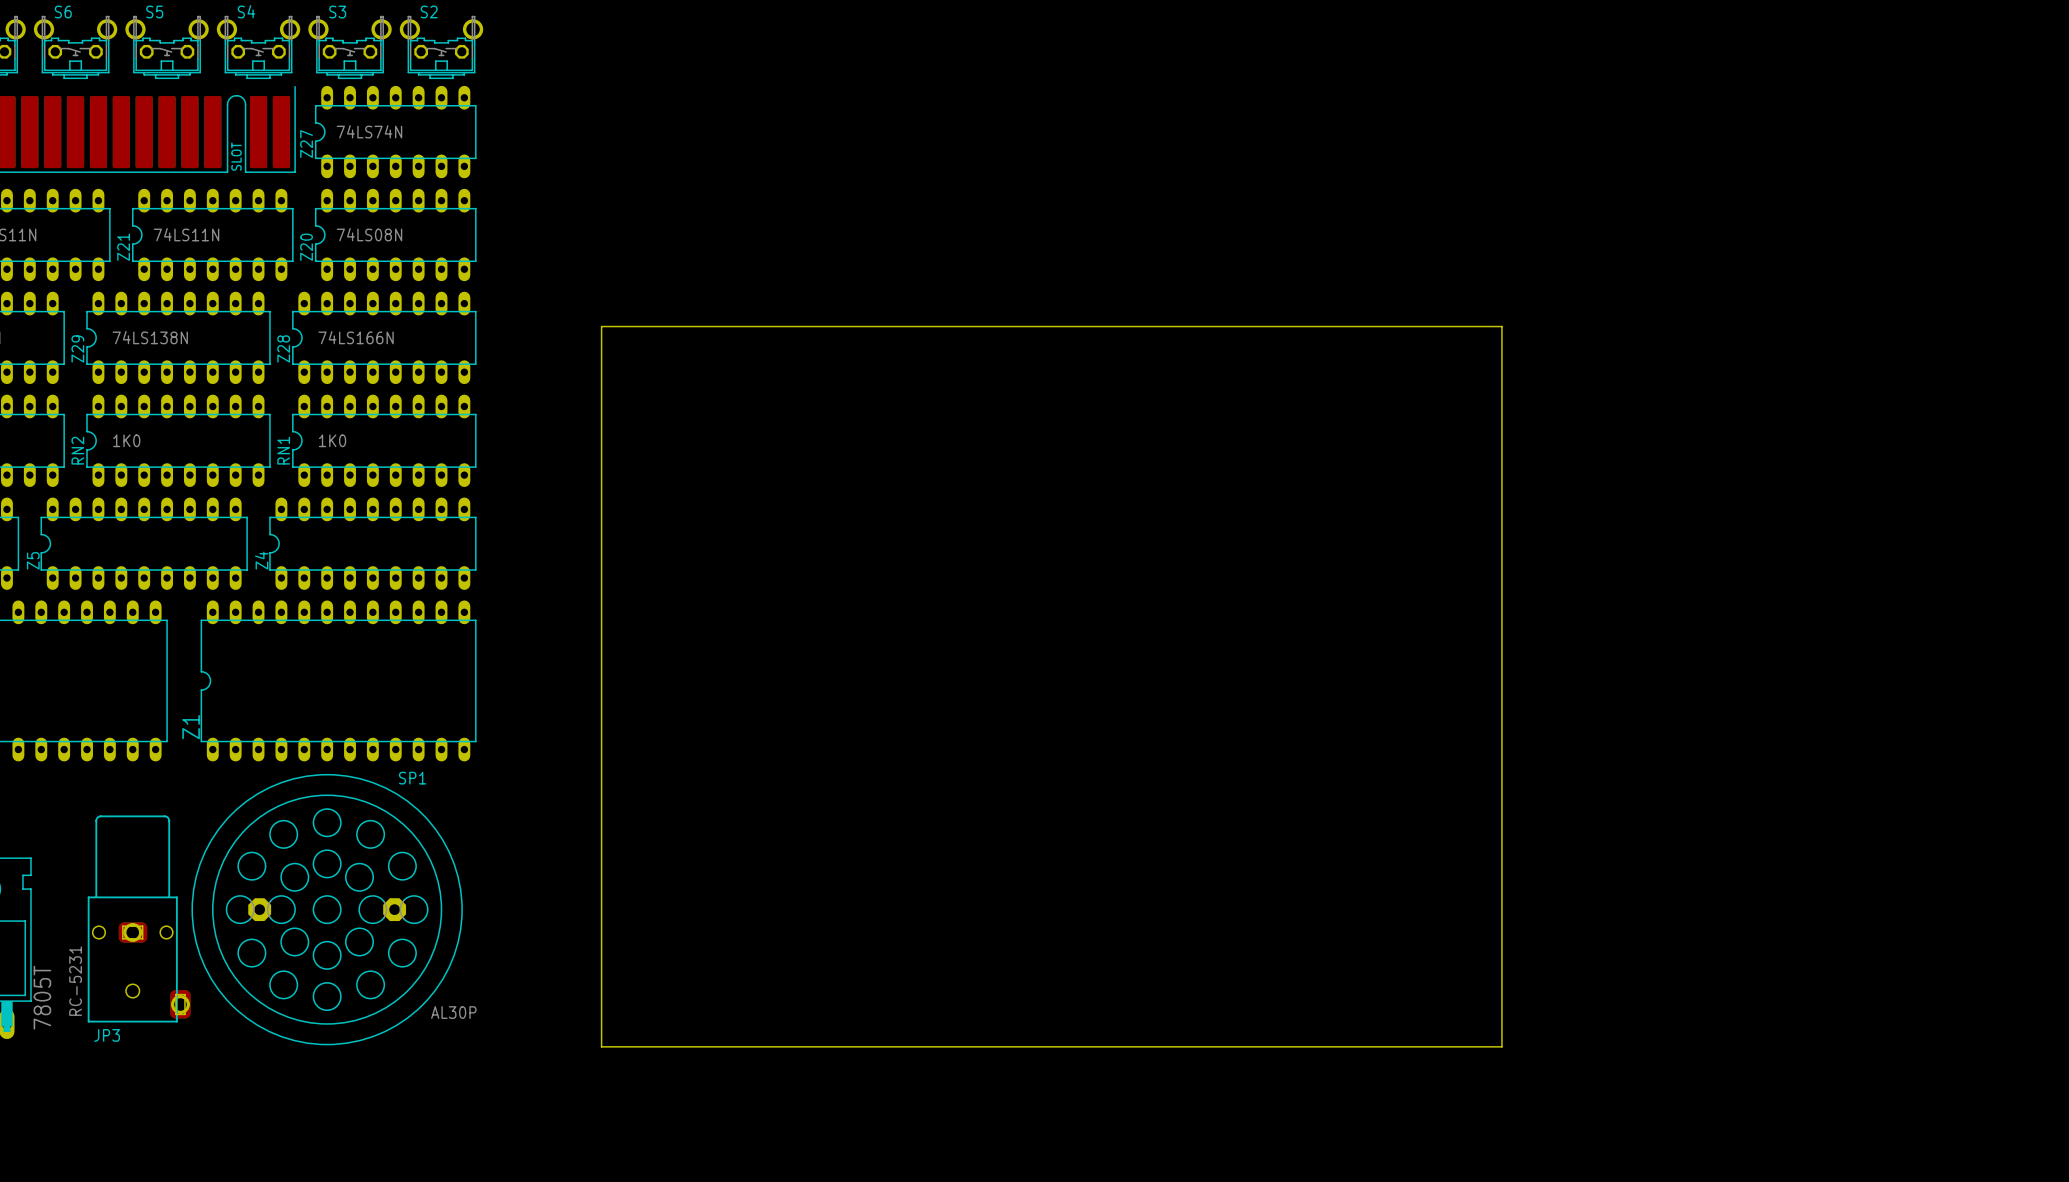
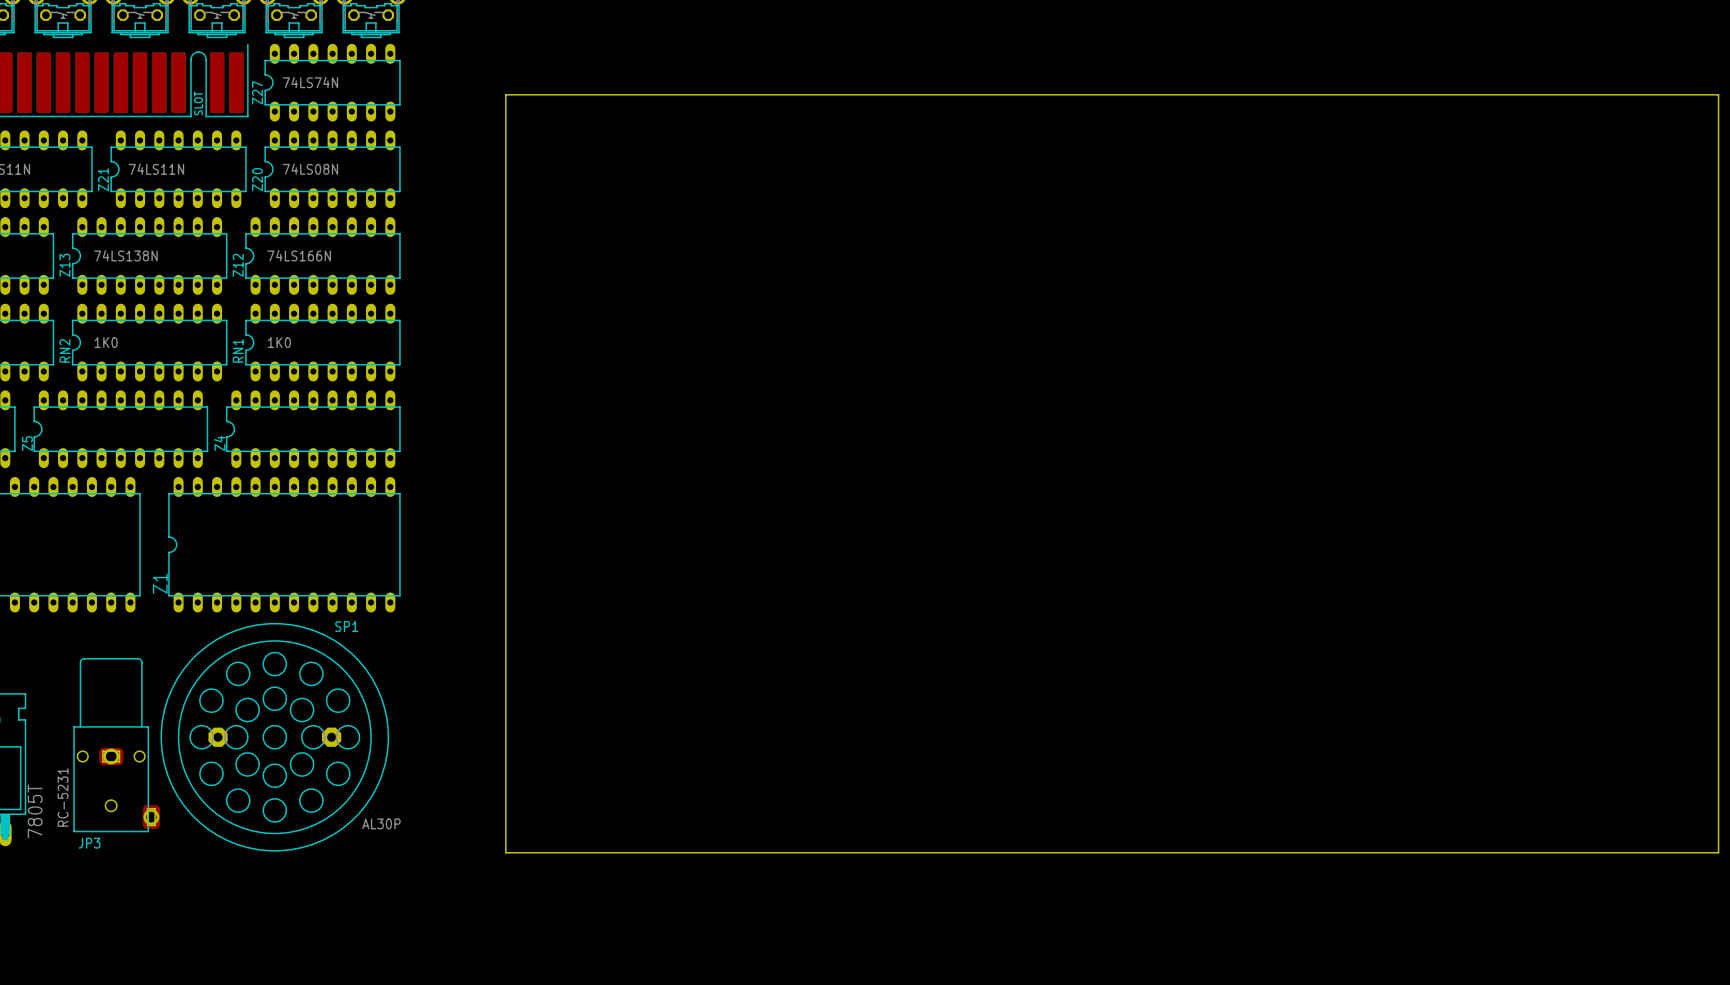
board edge: (601, 326) (1501, 326) (1501, 1046) -> (505, 246) (505, 94) (1718, 94) (1718, 852) (1263, 852)
Z29 name: Z29 (77, 348) -> Z13 (64, 265)
Z28 name: Z28 (283, 348) -> Z12 (238, 265)

